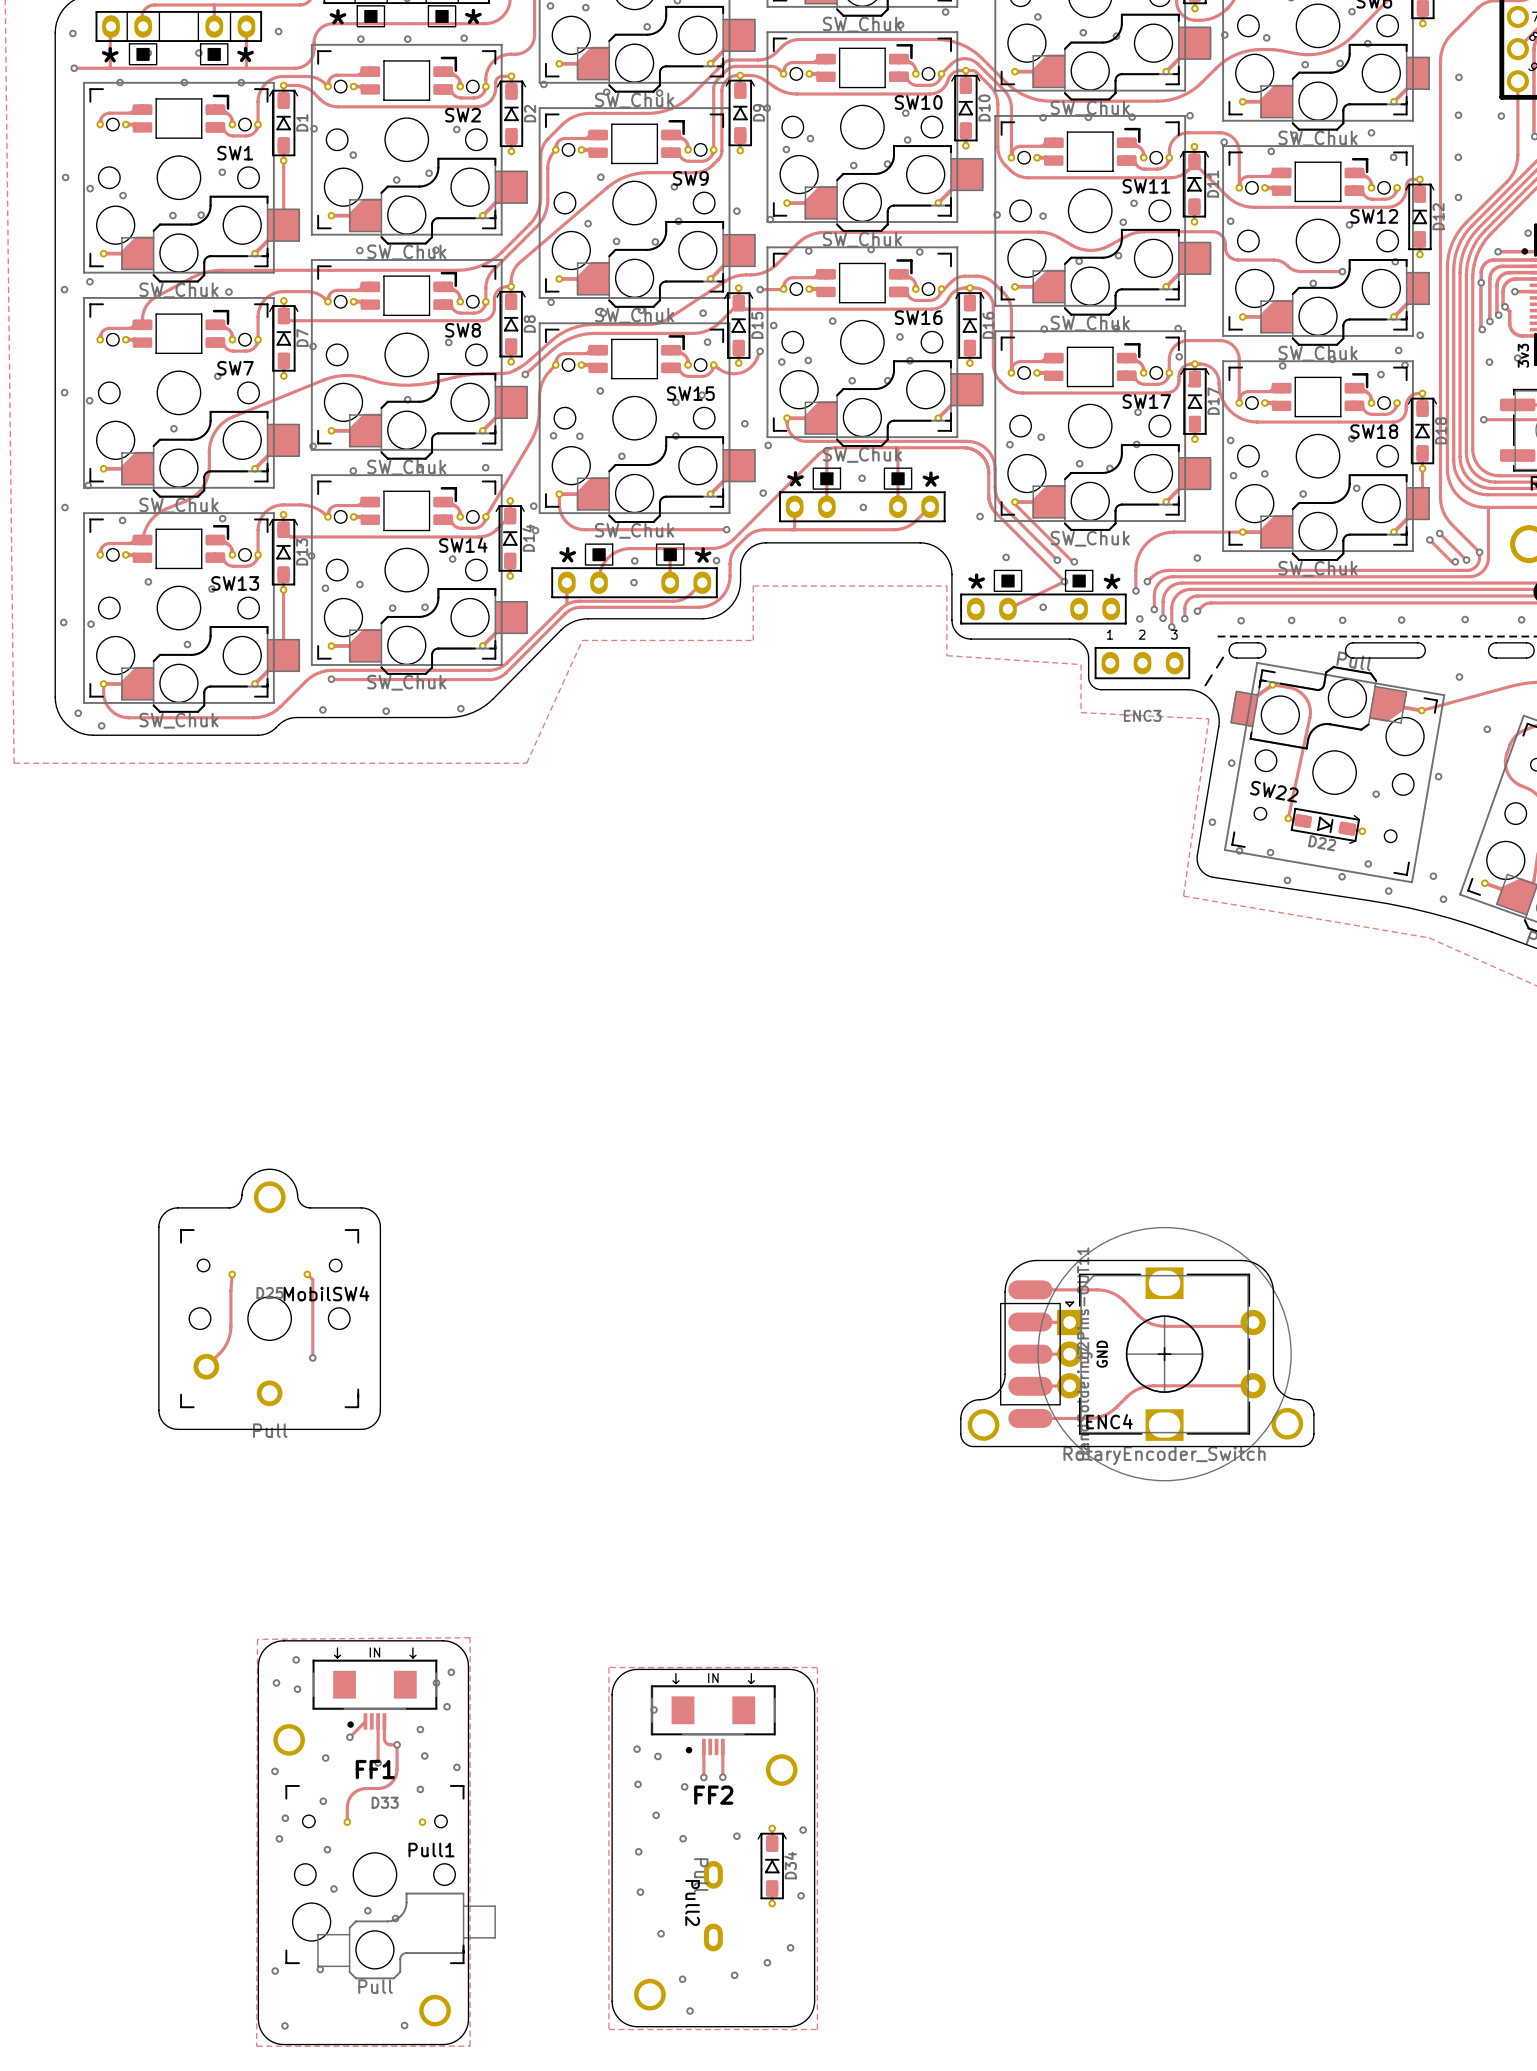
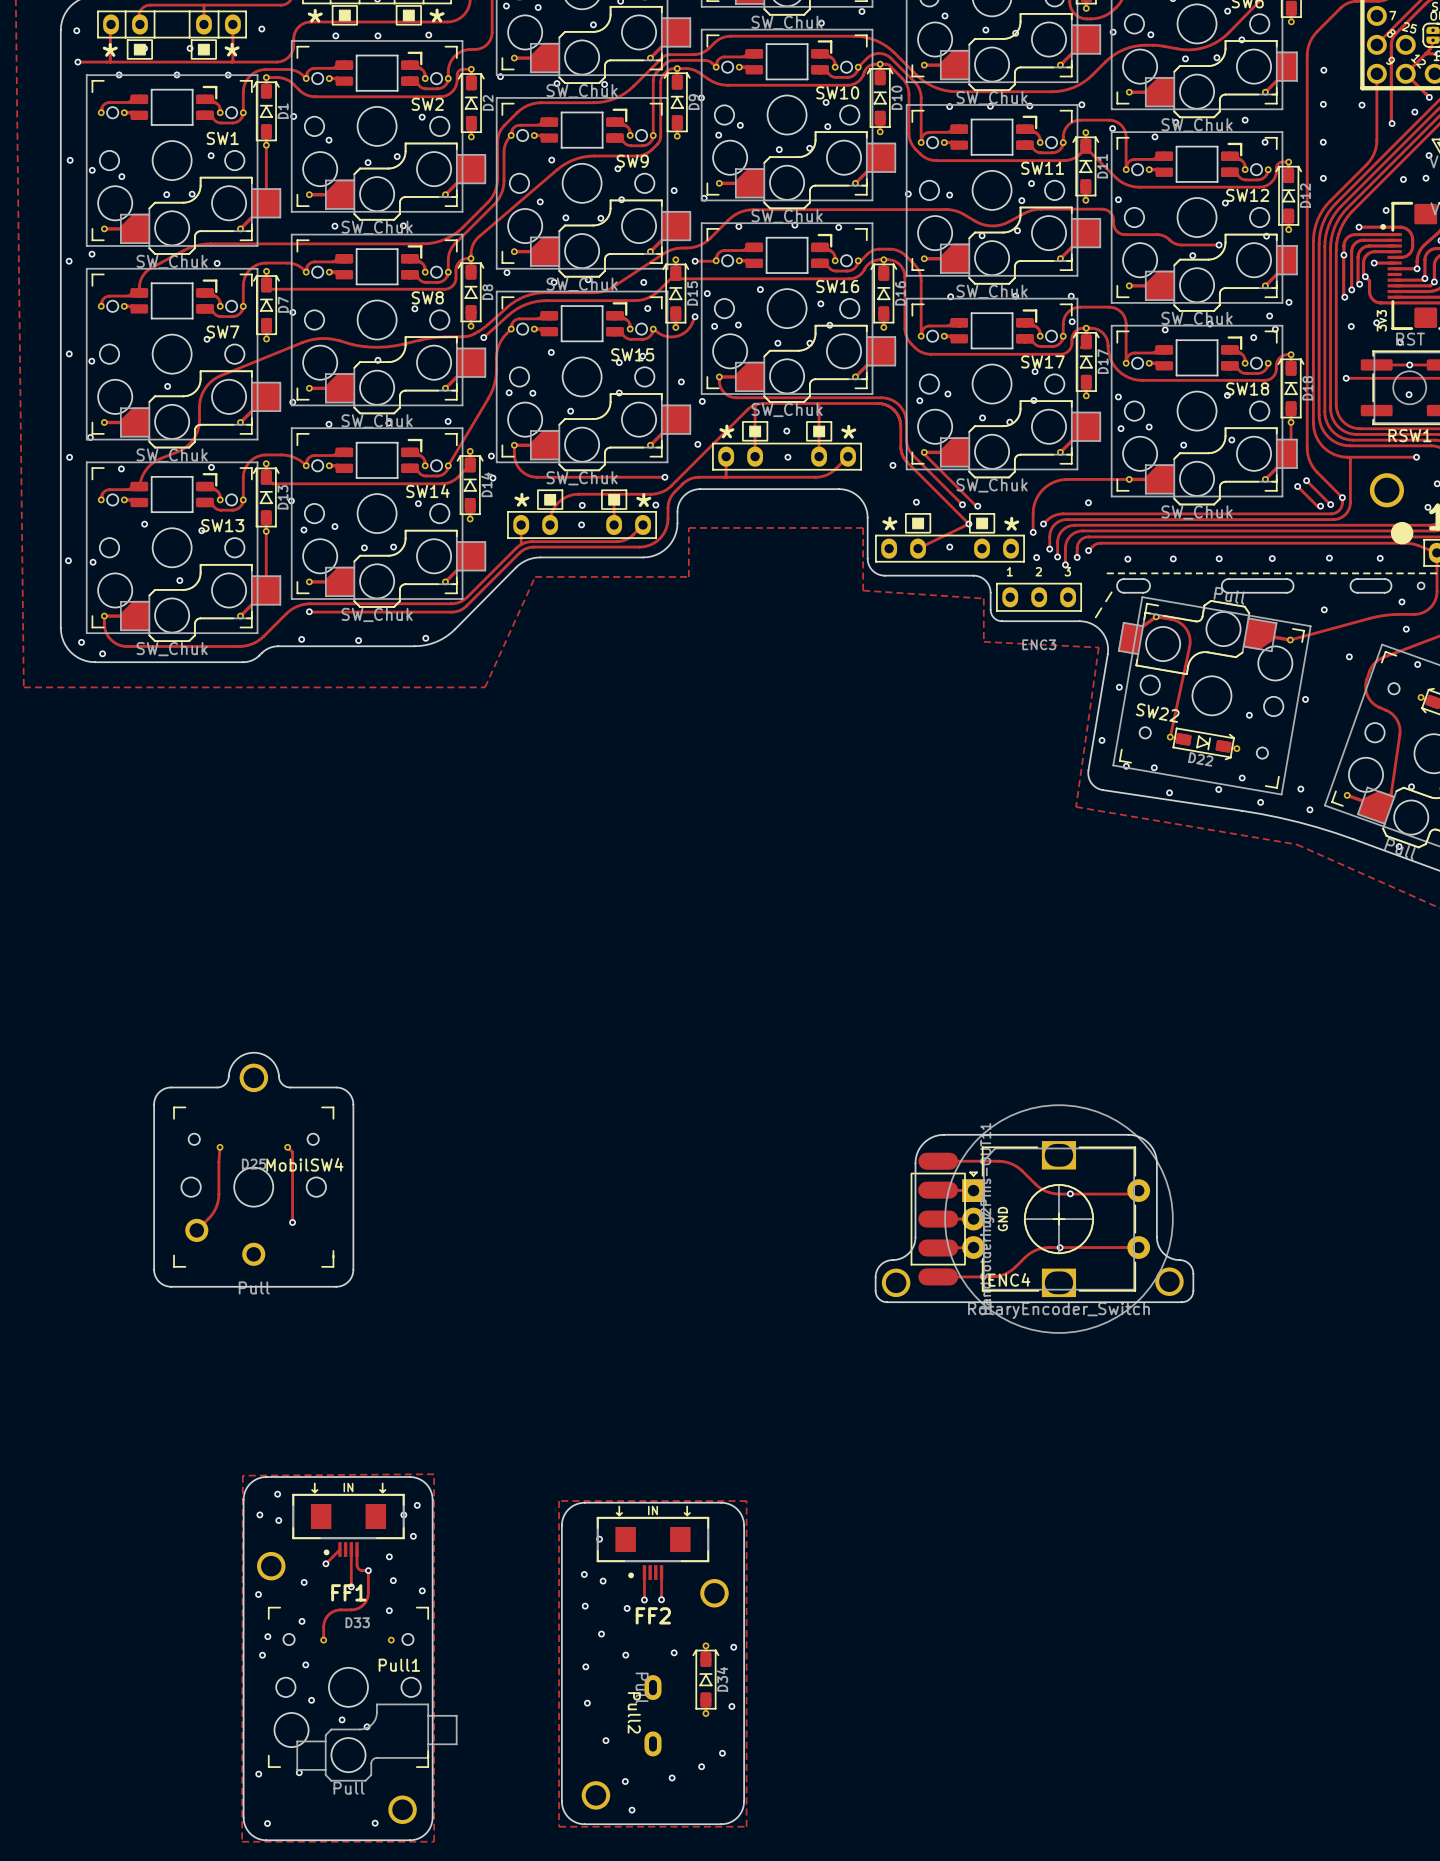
via: none -> (1070, 1193)
via: none -> (1060, 1247)

